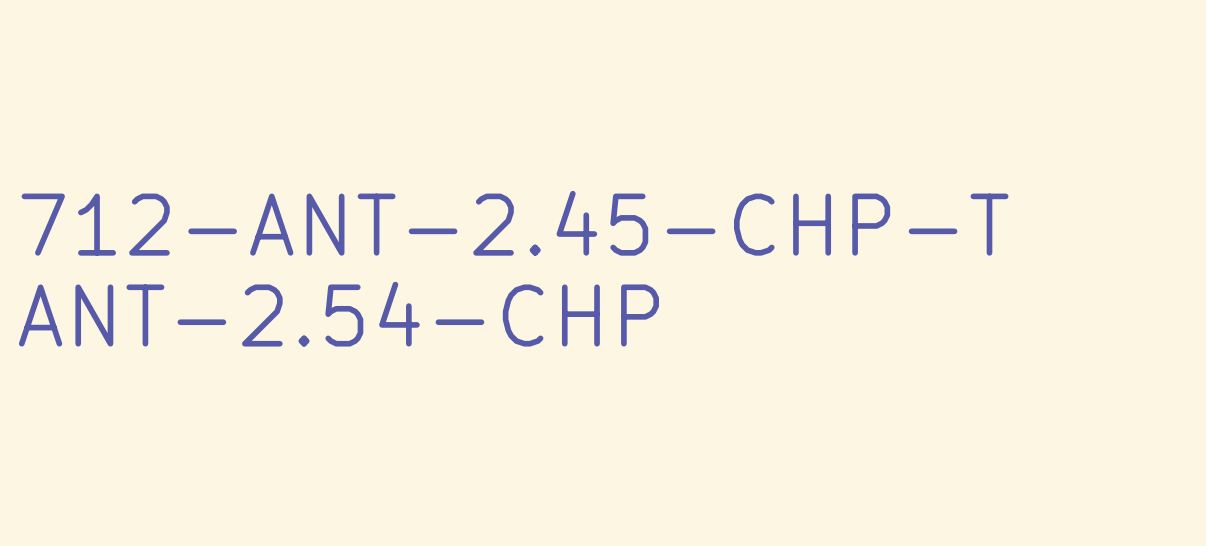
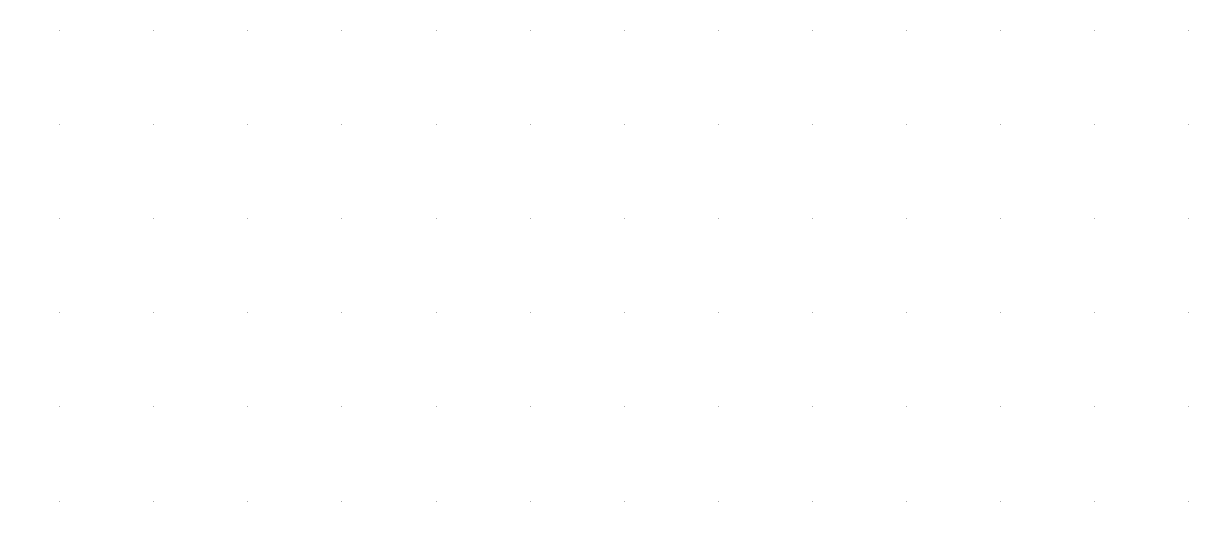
text: 712-ANT-2.45-CHP-T (515, 223) -> none
text: ANT-2.54-CHP (338, 314) -> none

